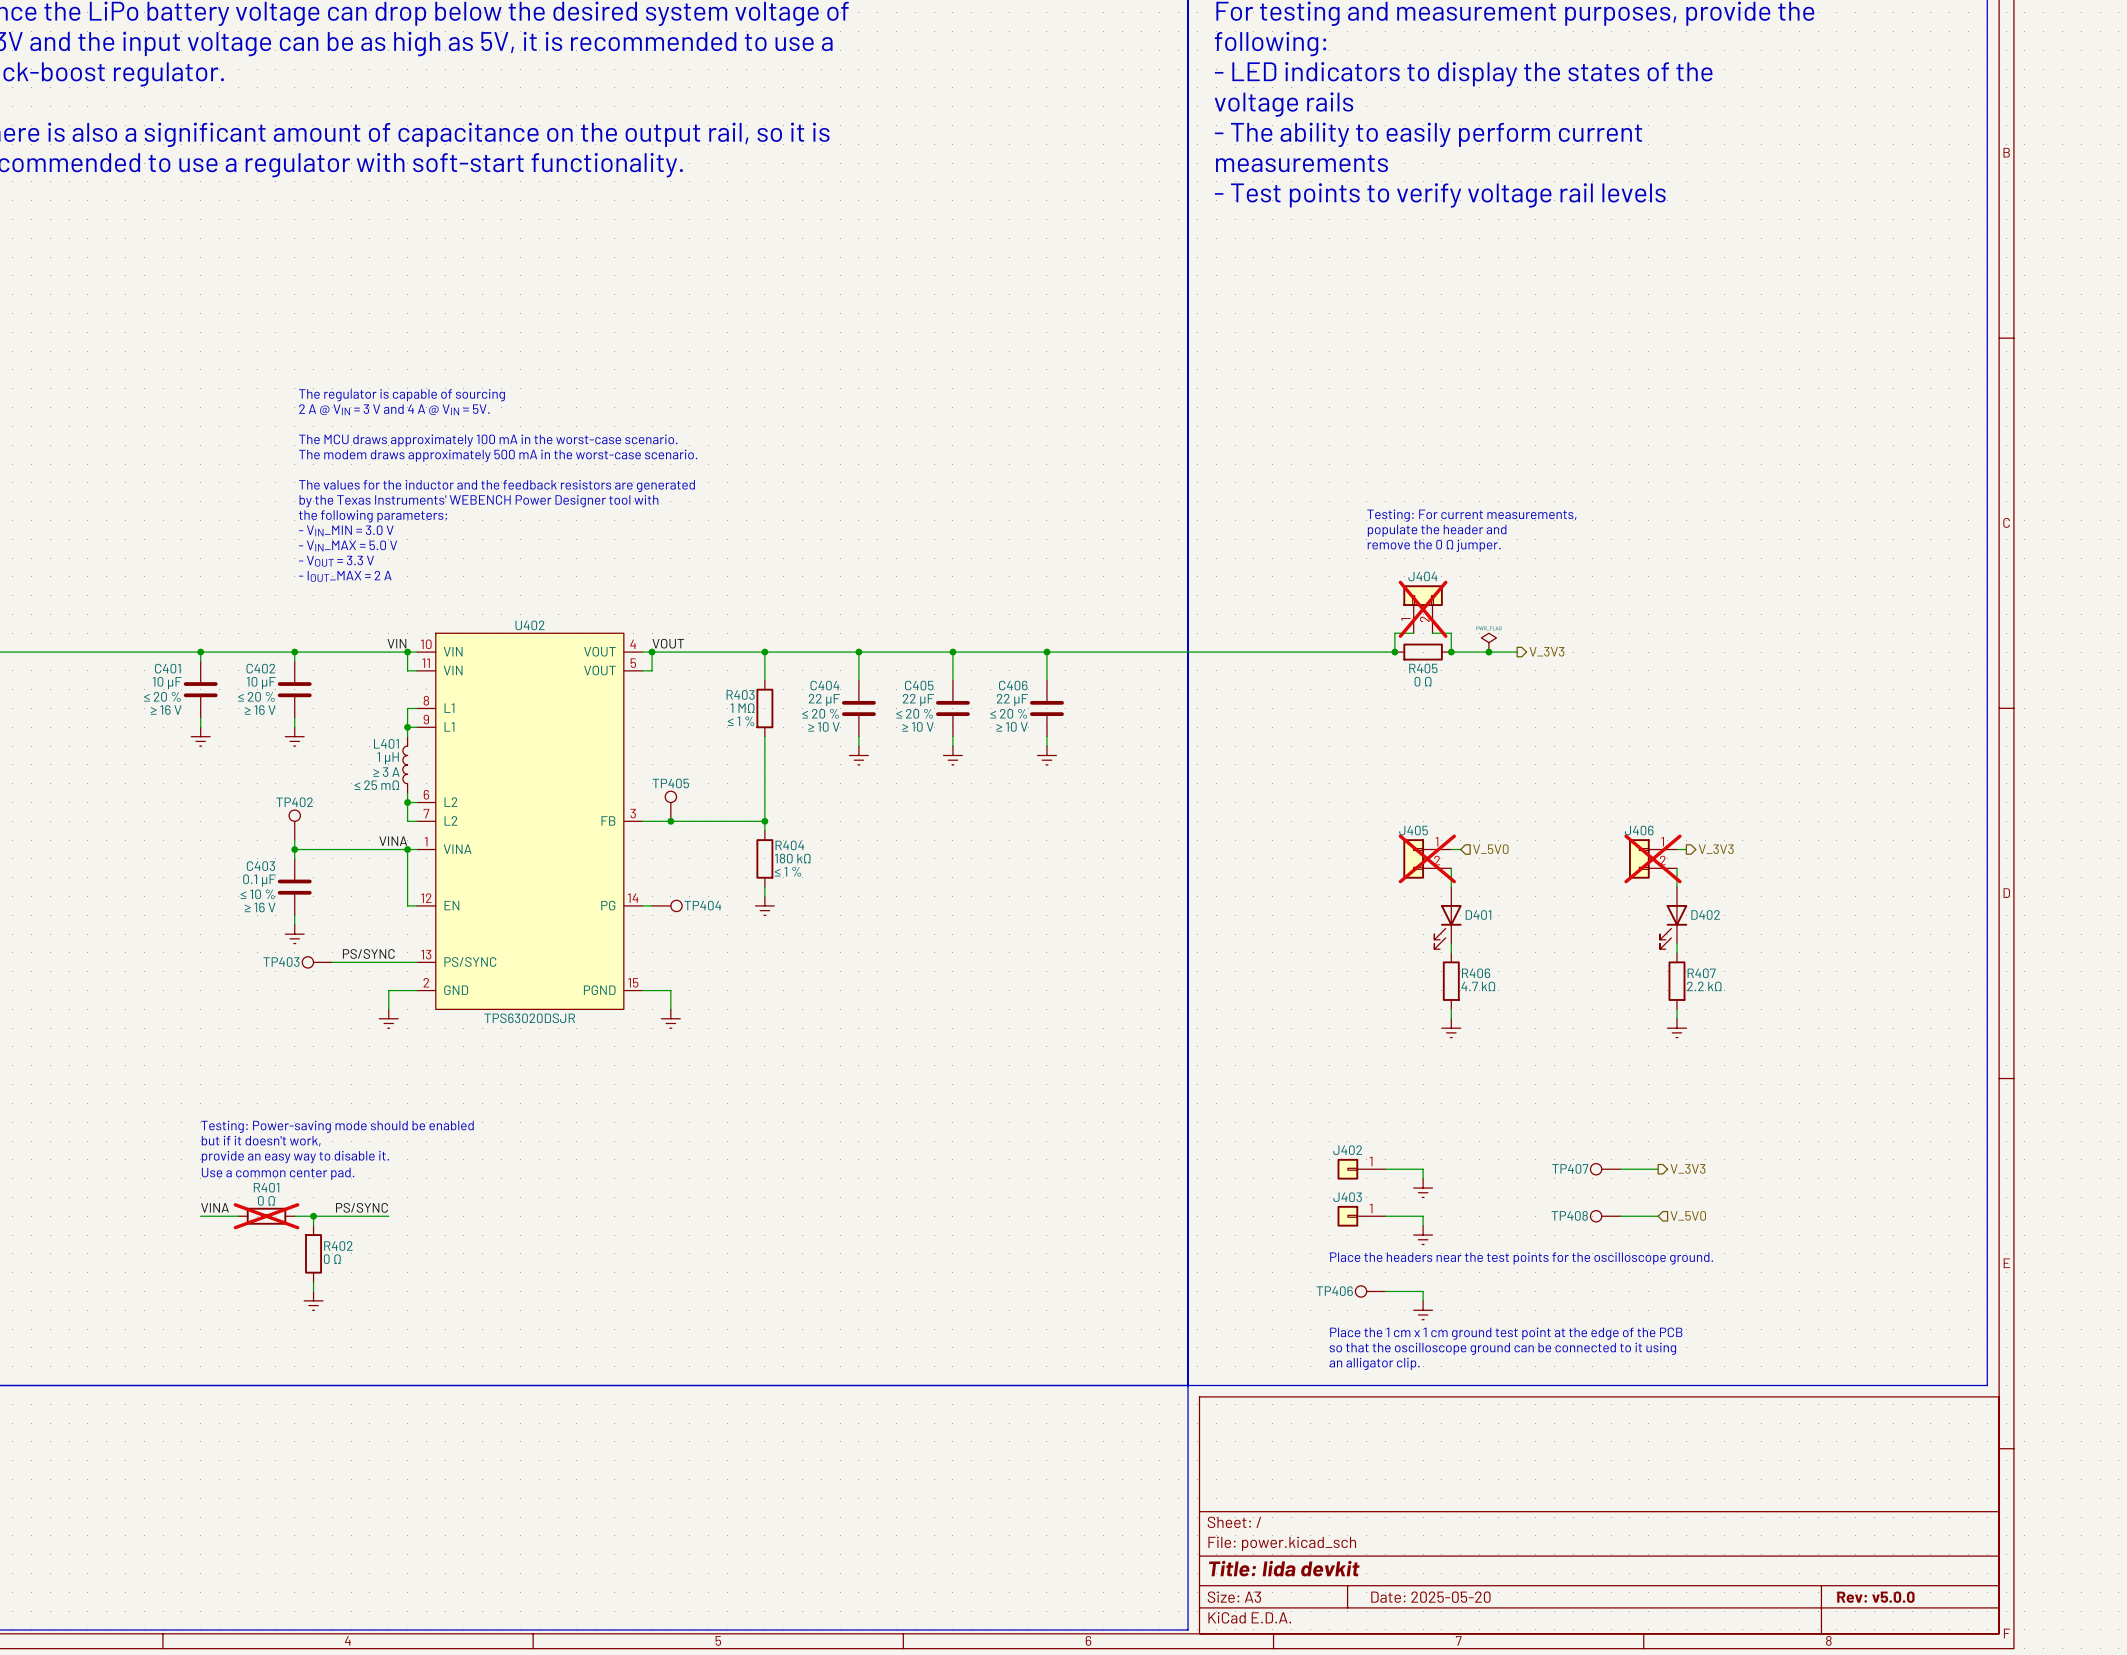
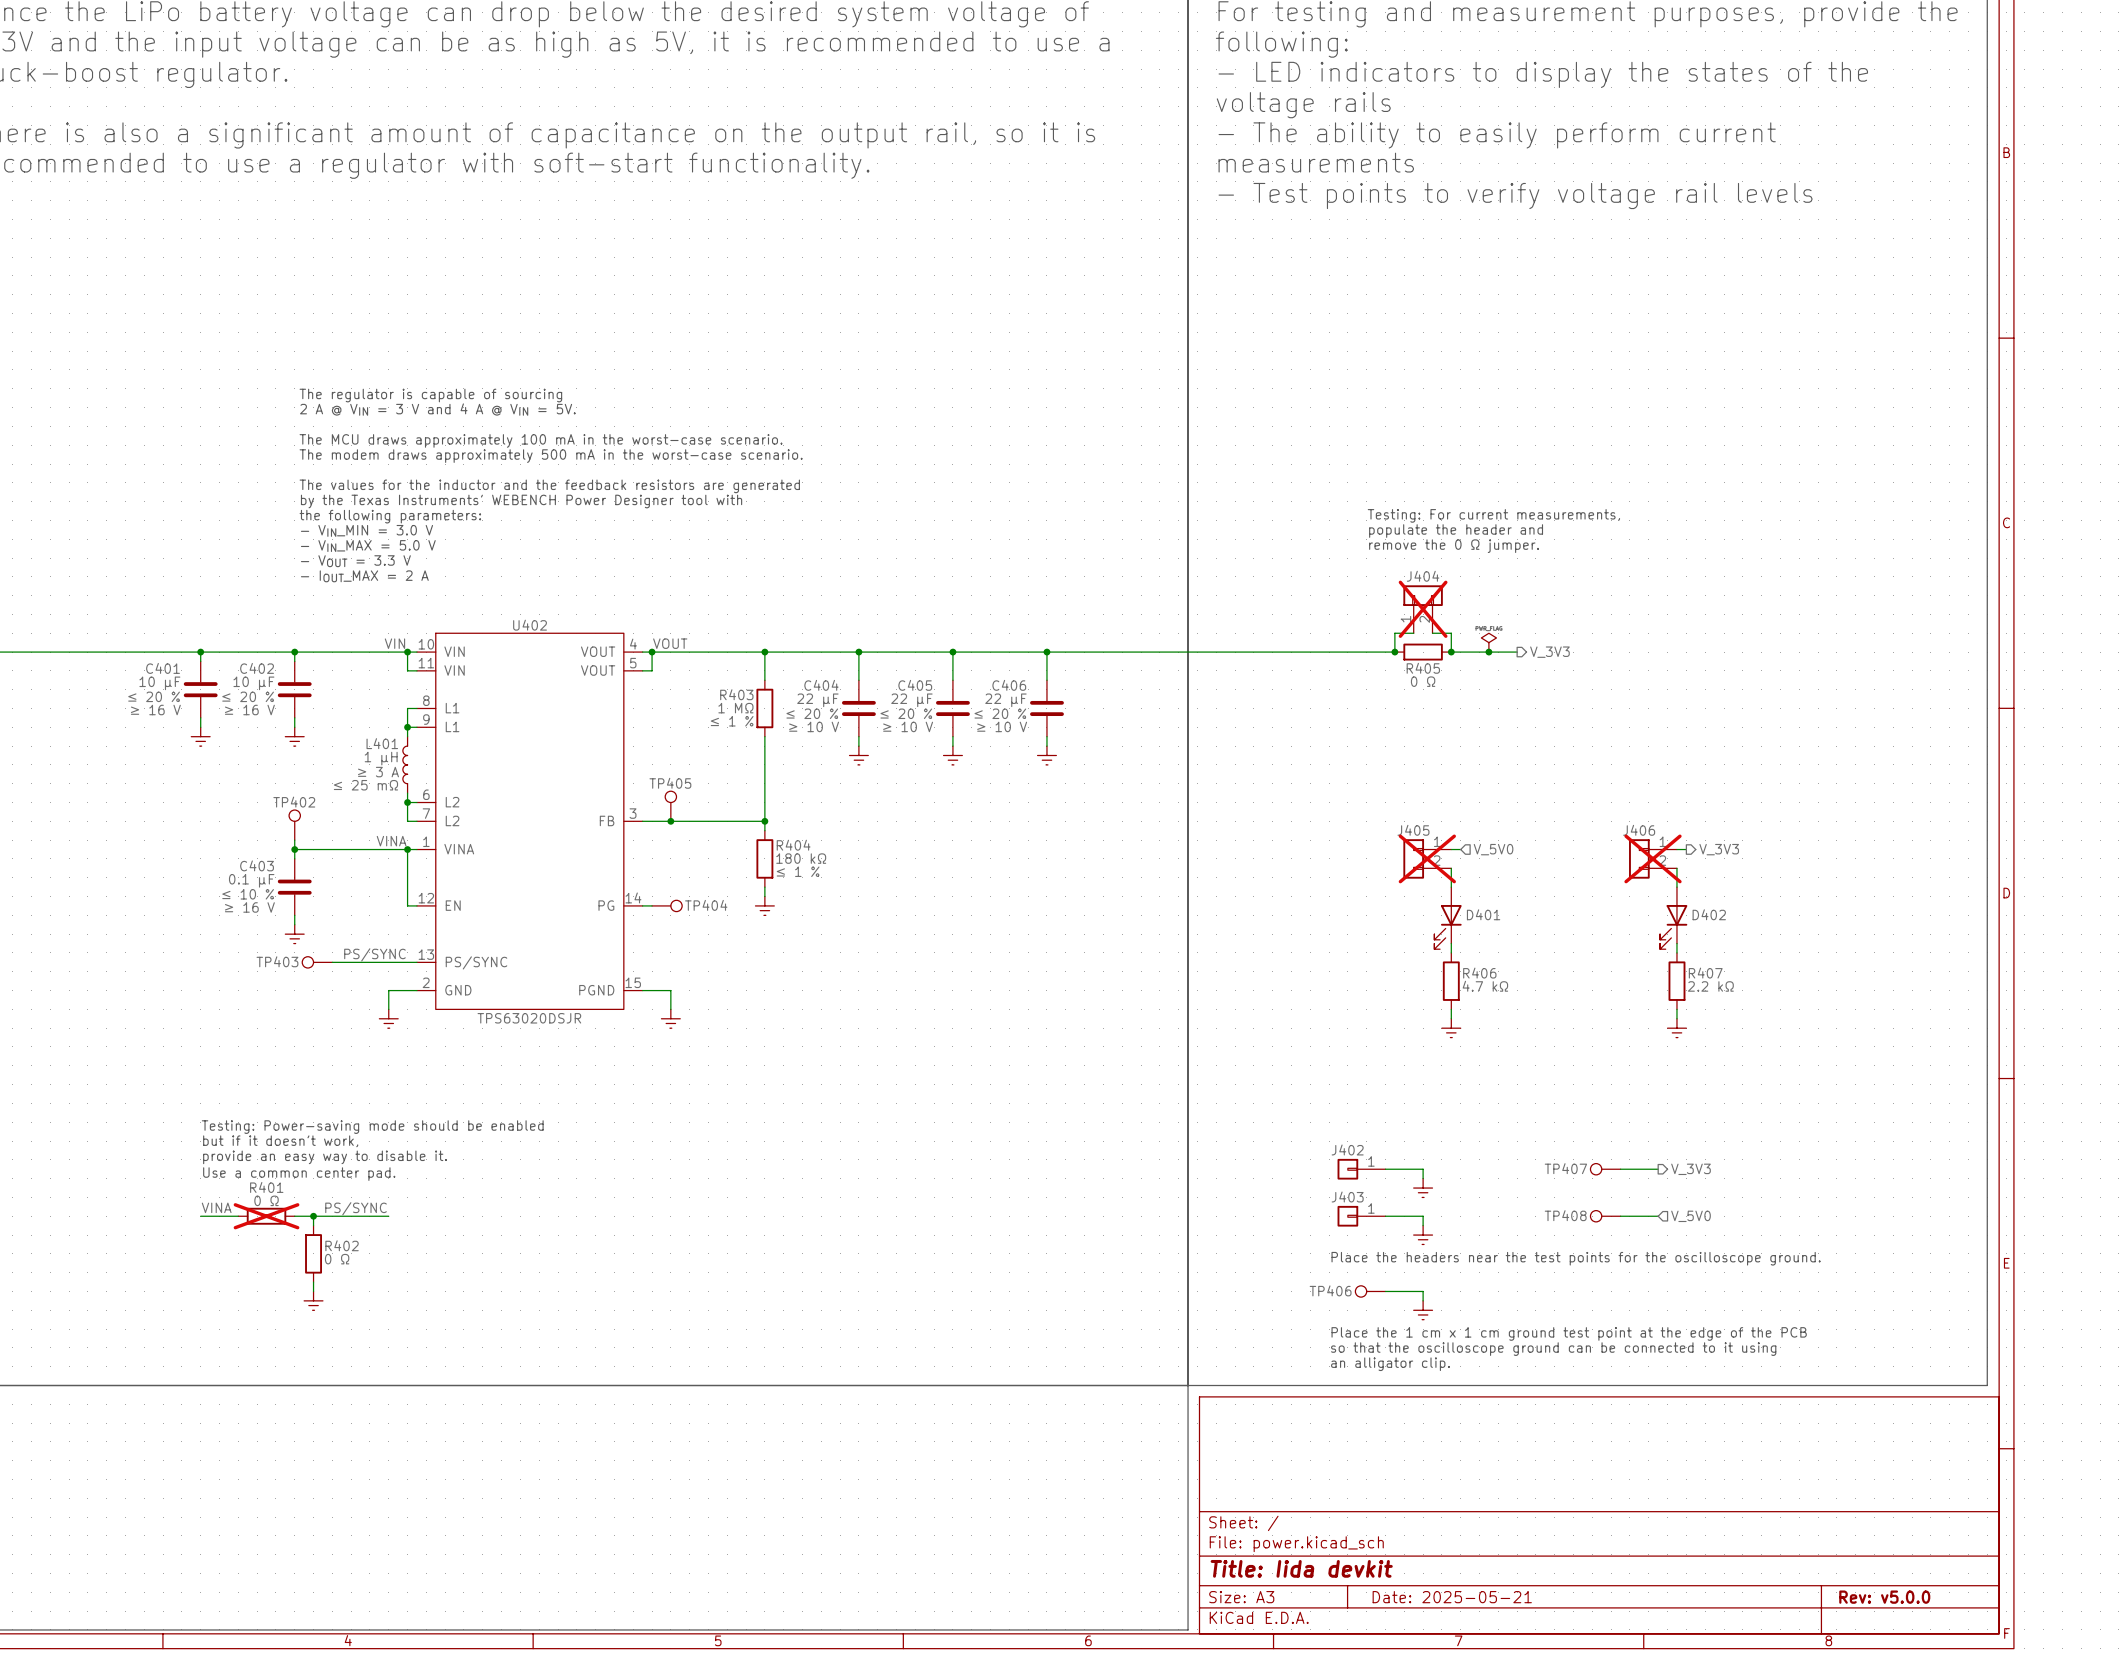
title block: Date: 2025-05-20 (1430, 1597) -> Date: 2025-05-21 (1452, 1597)

